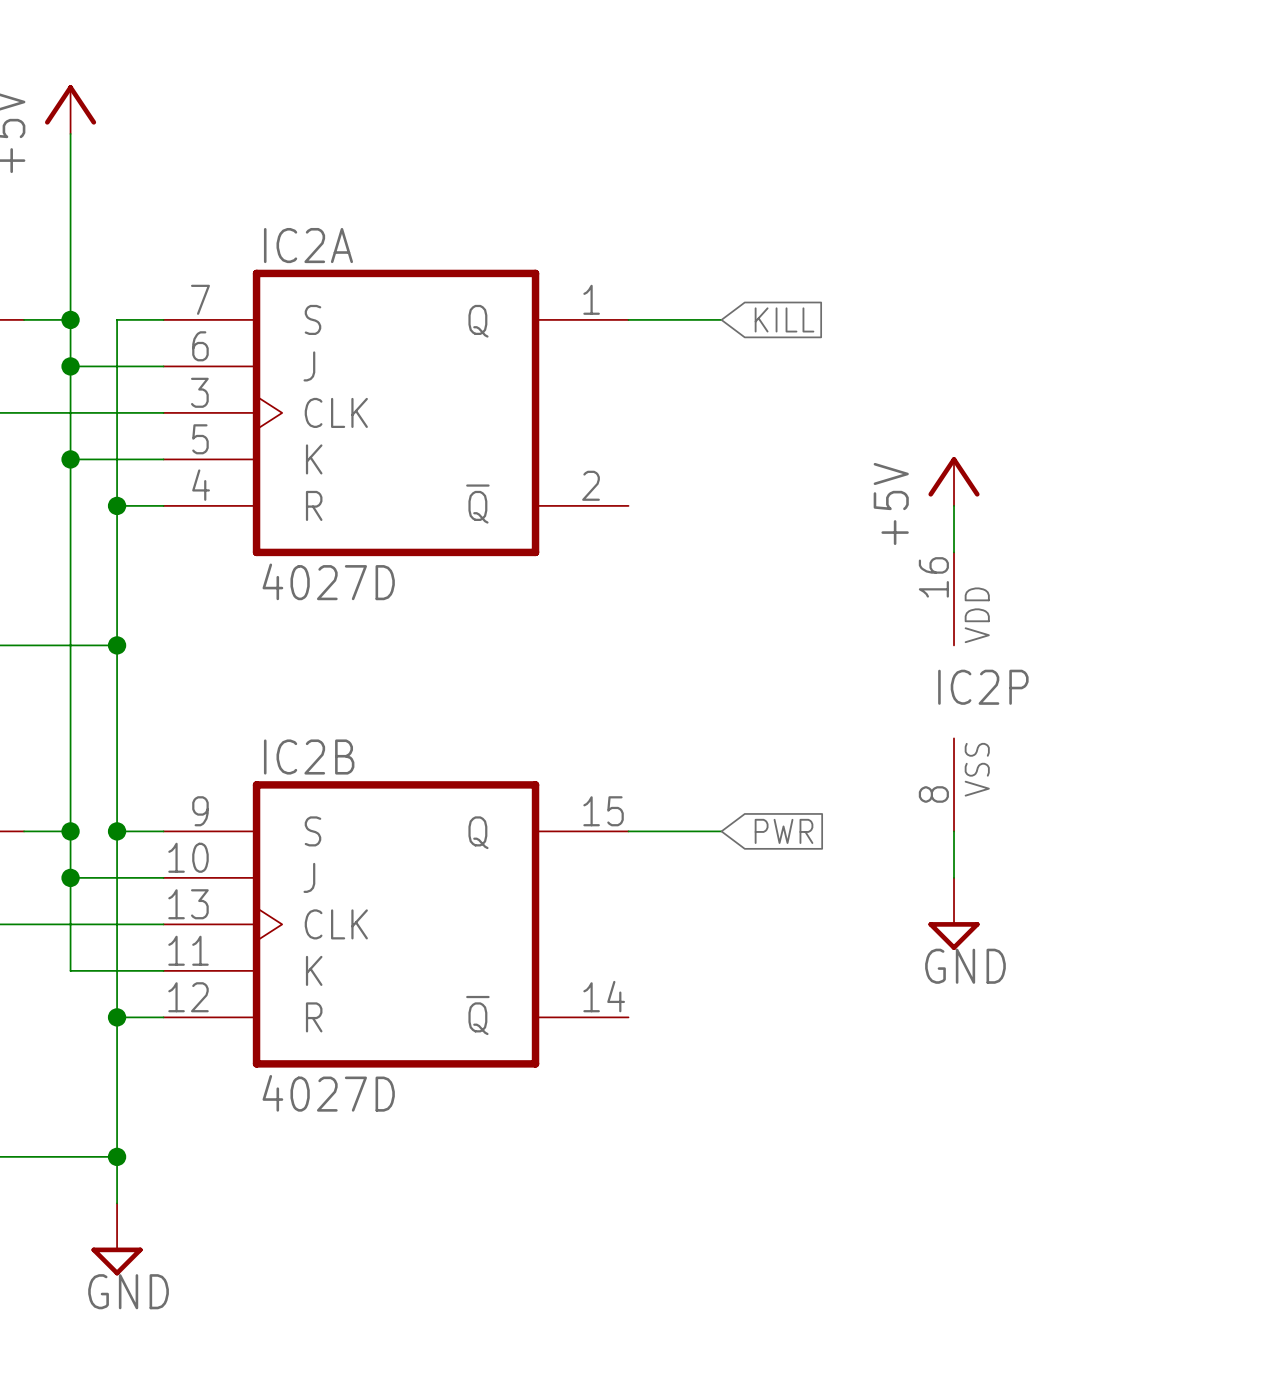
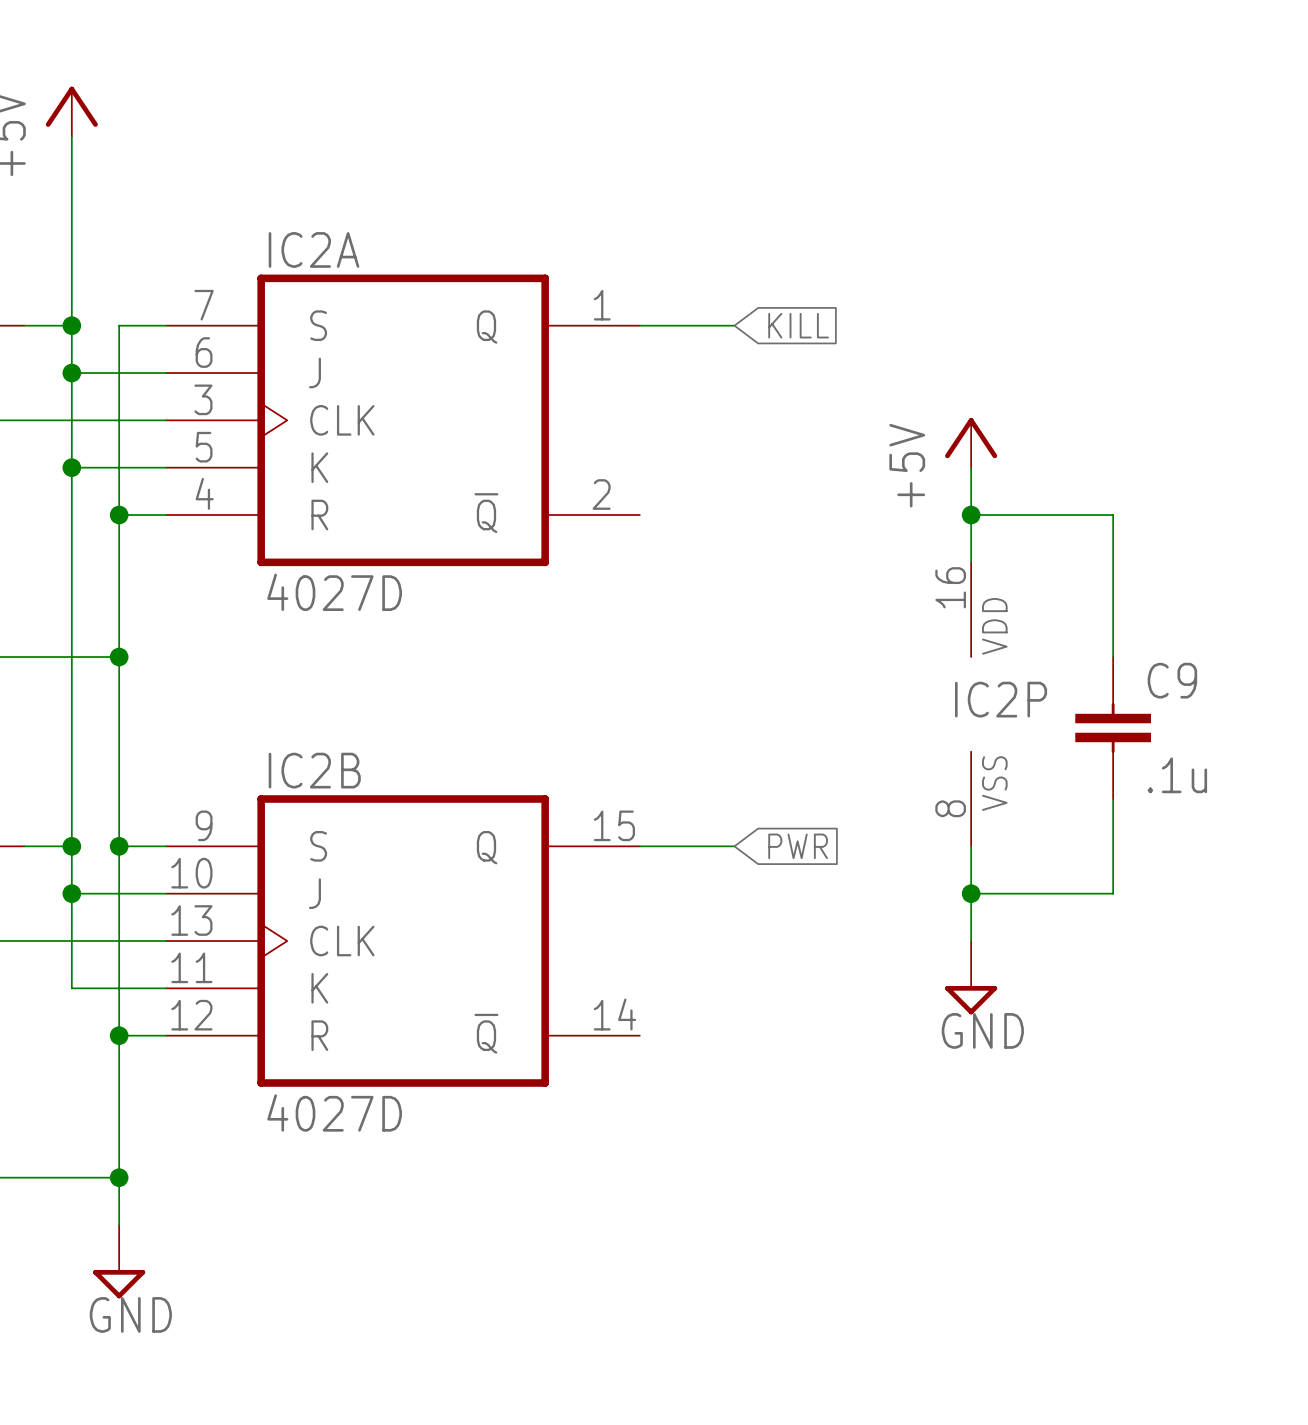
wire: none -> (971, 467) (971, 515) (1113, 515) (1113, 657)
power symbol position: +5V (954, 481) -> +5V (971, 442)
junction: none -> (971, 515)
C9: none -> .1u (1113, 728)
wire: none -> (1113, 799) (1113, 893) (971, 893) (971, 941)
junction: none -> (971, 893)
power symbol position: GND (954, 913) -> GND (971, 977)

